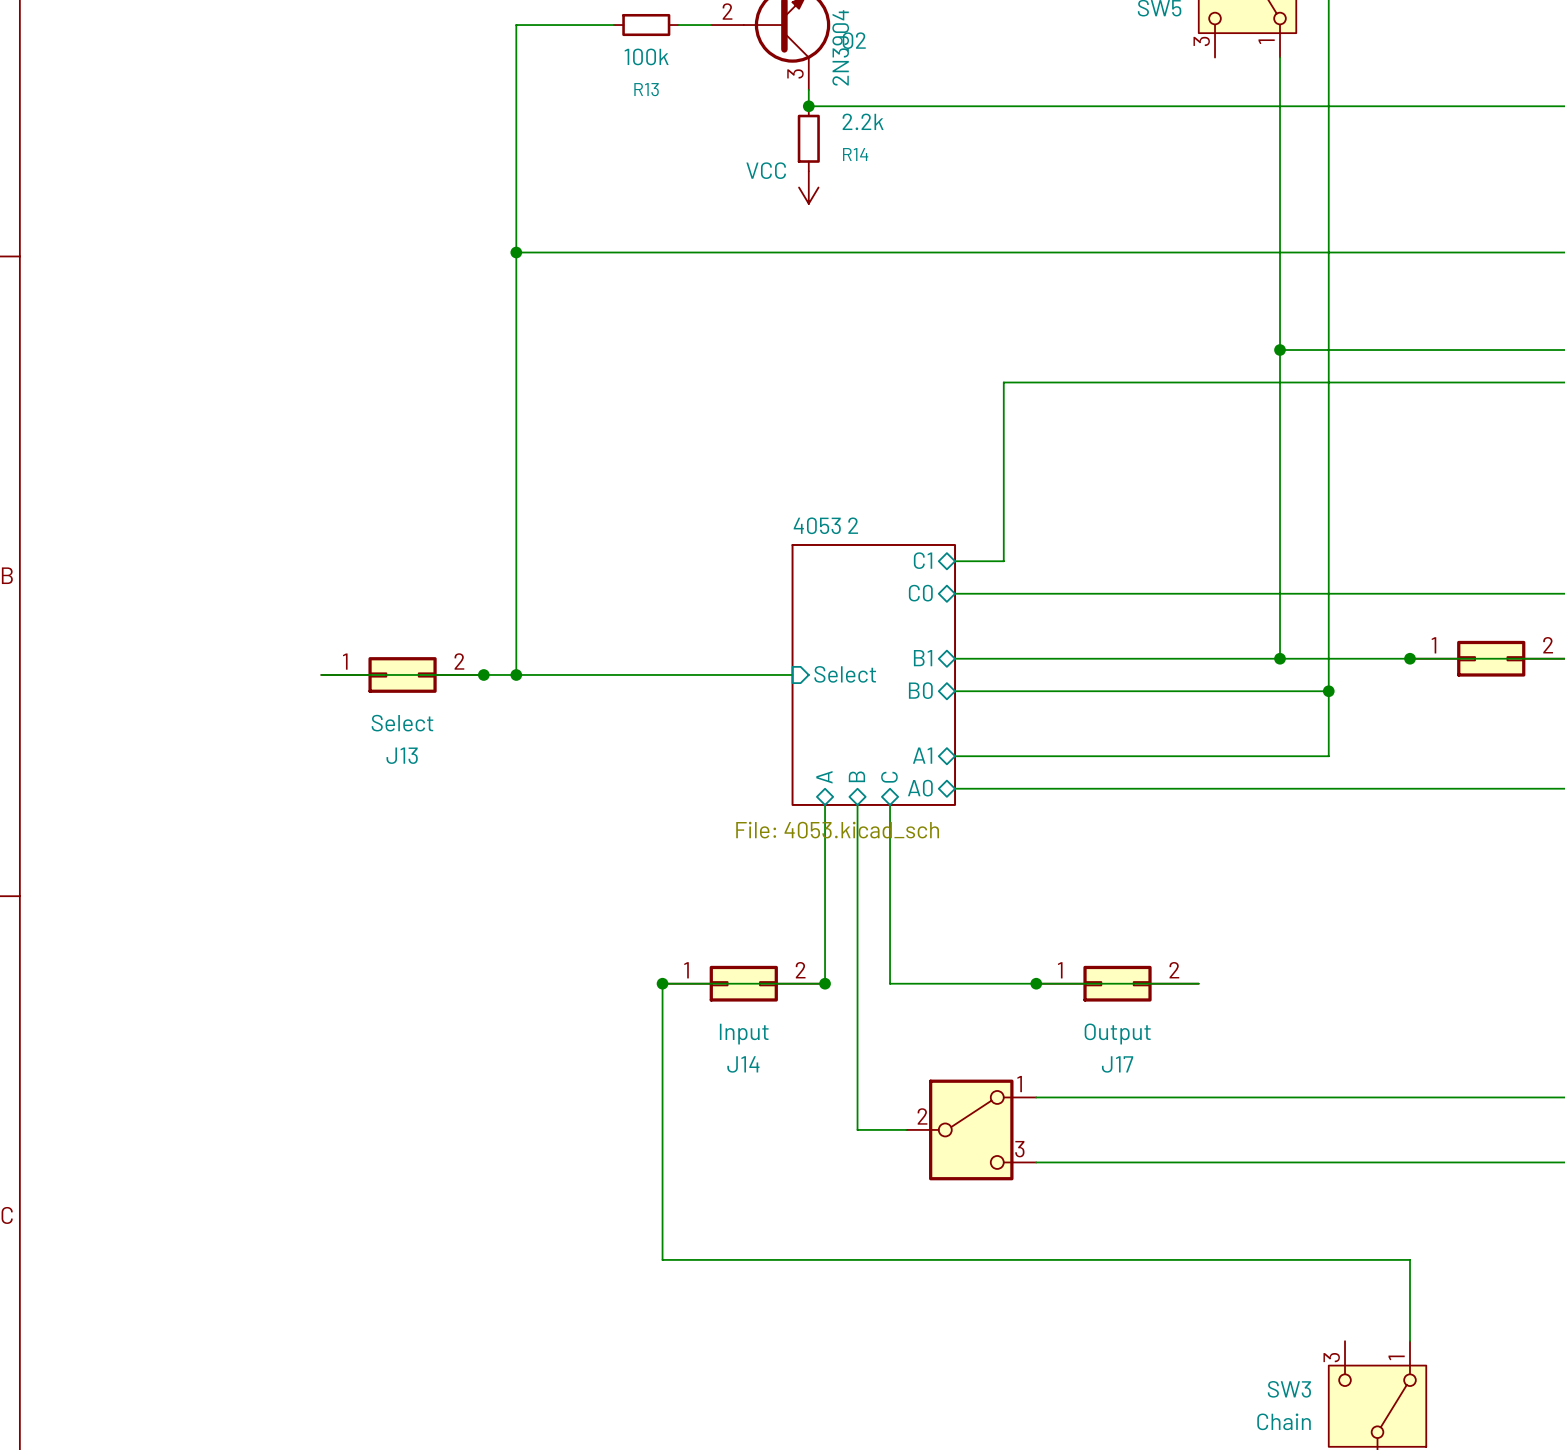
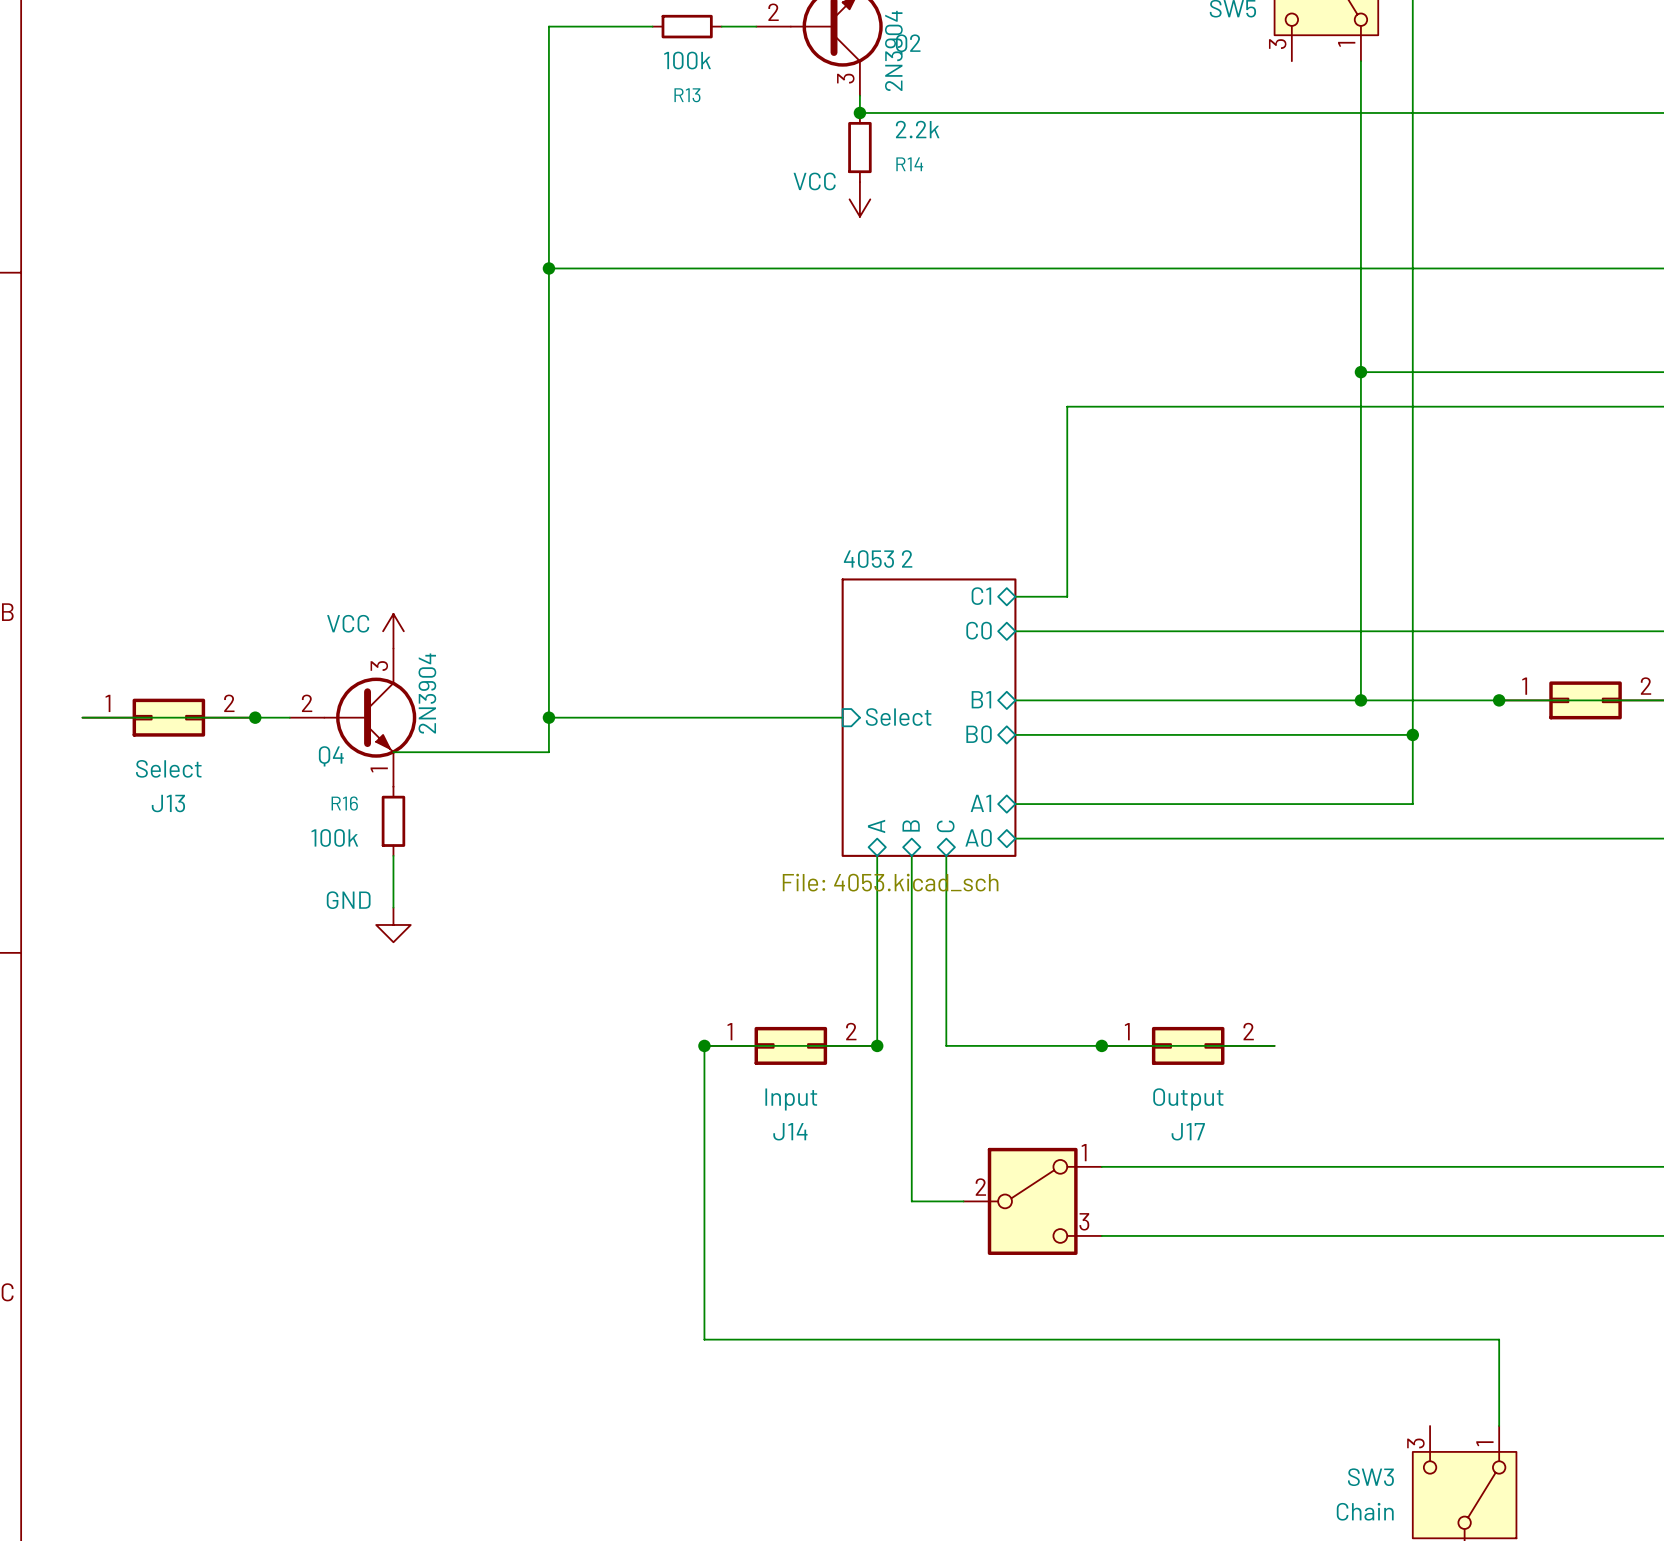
power symbol: none -> VCC (393, 631)
wire: none -> (82, 717) (289, 717)
junction: none -> (255, 717)
wire: (321, 674) (516, 674) -> (393, 752) (548, 752) (548, 717)
Q4: none -> 2N3904 (353, 717)
J13 position: (402, 674) -> (168, 717)
junction: (483, 674) -> none
R16: none -> 100k (393, 821)
wire: none -> (393, 855) (393, 907)
power symbol: none -> GND (393, 924)

